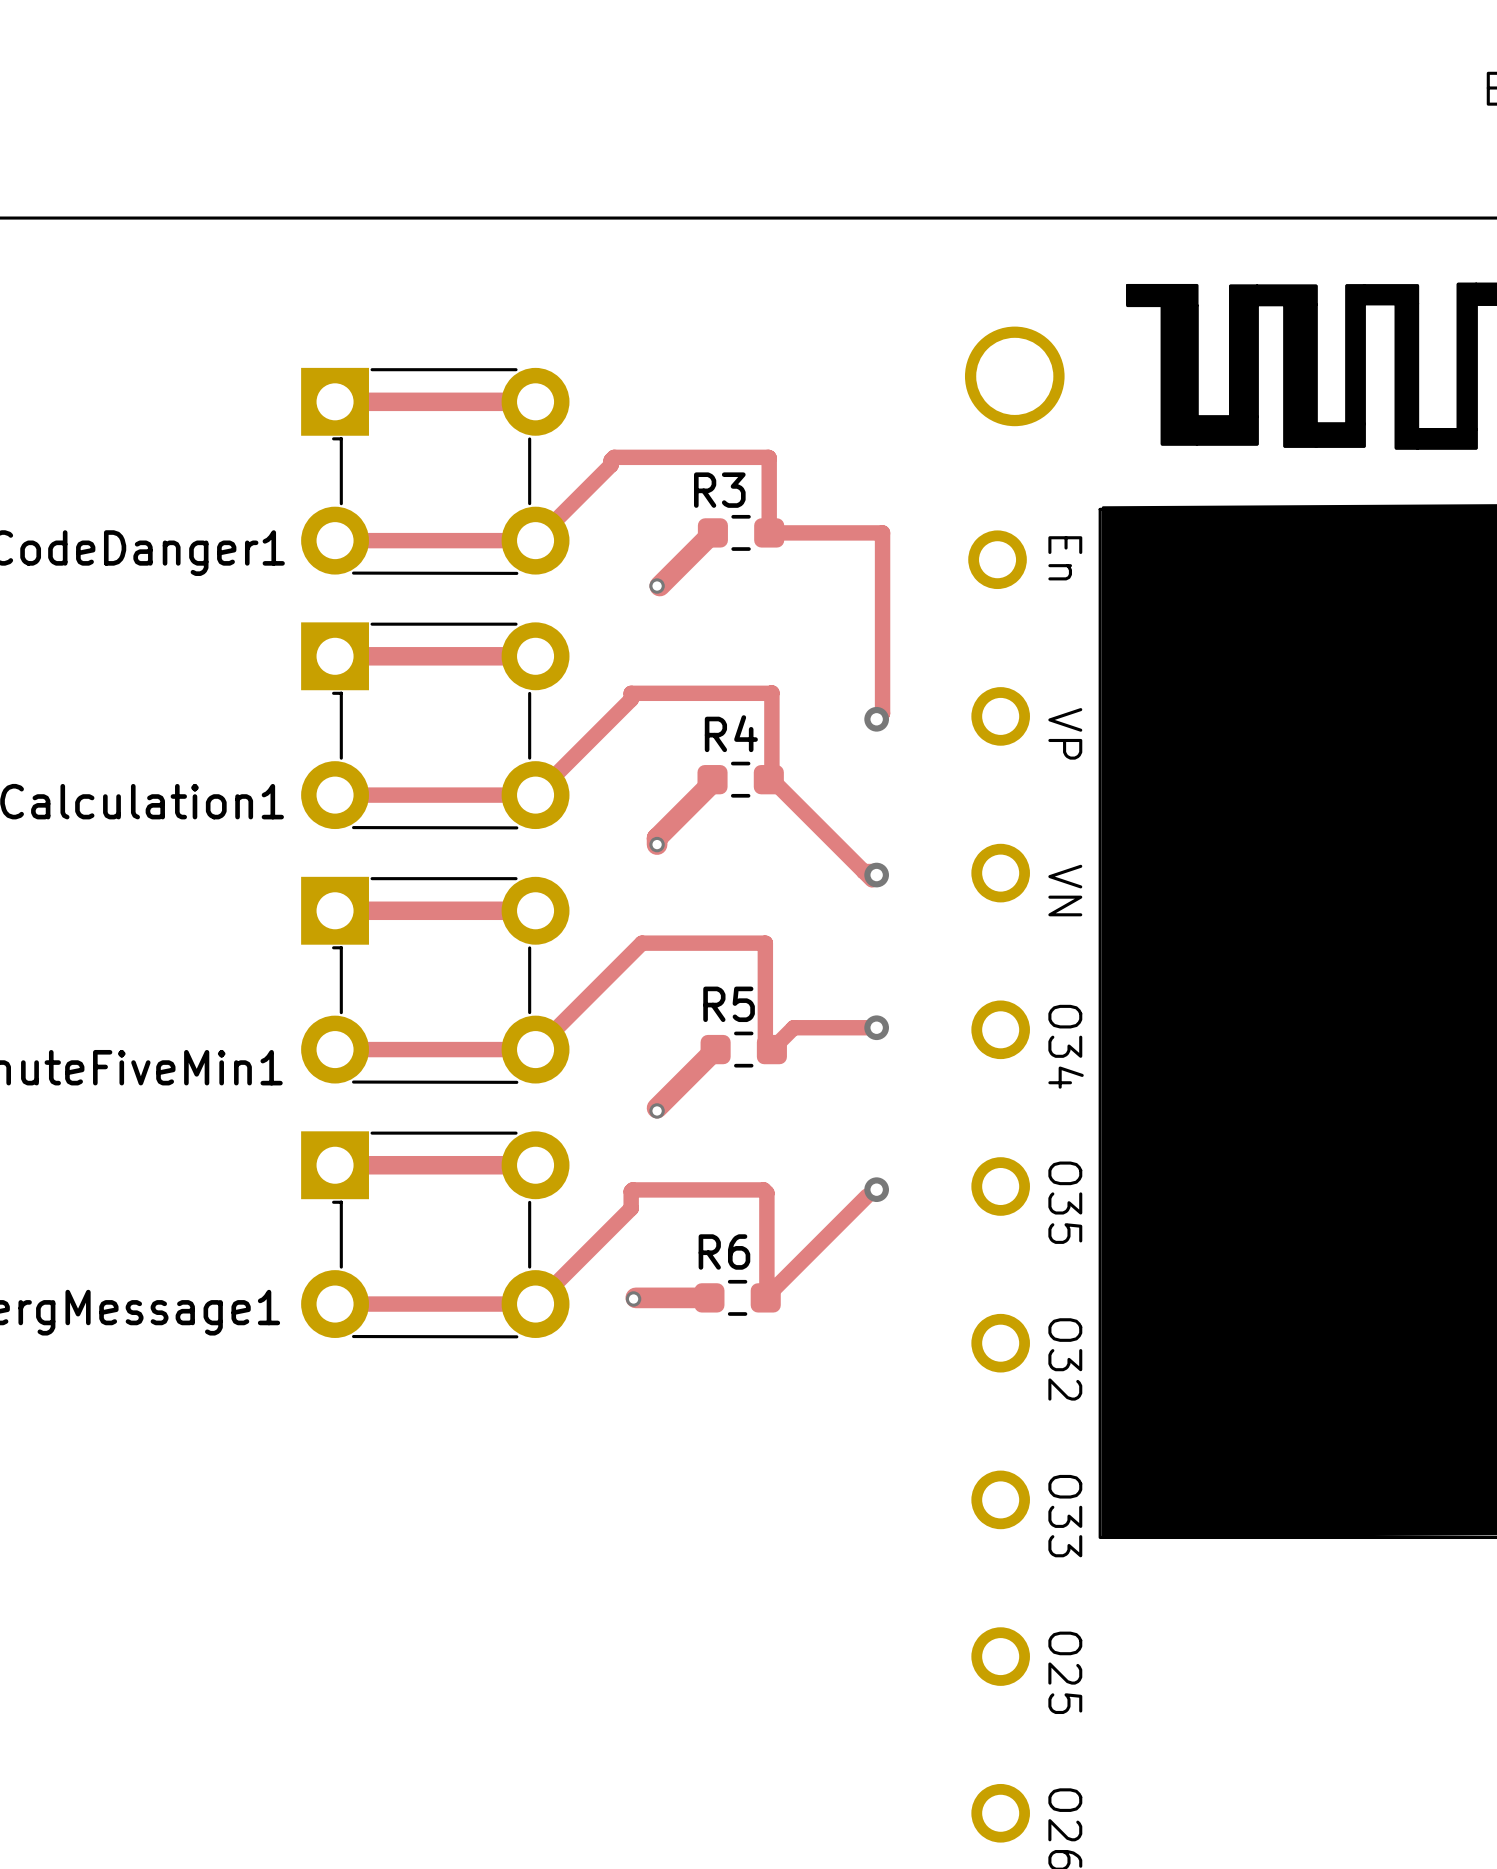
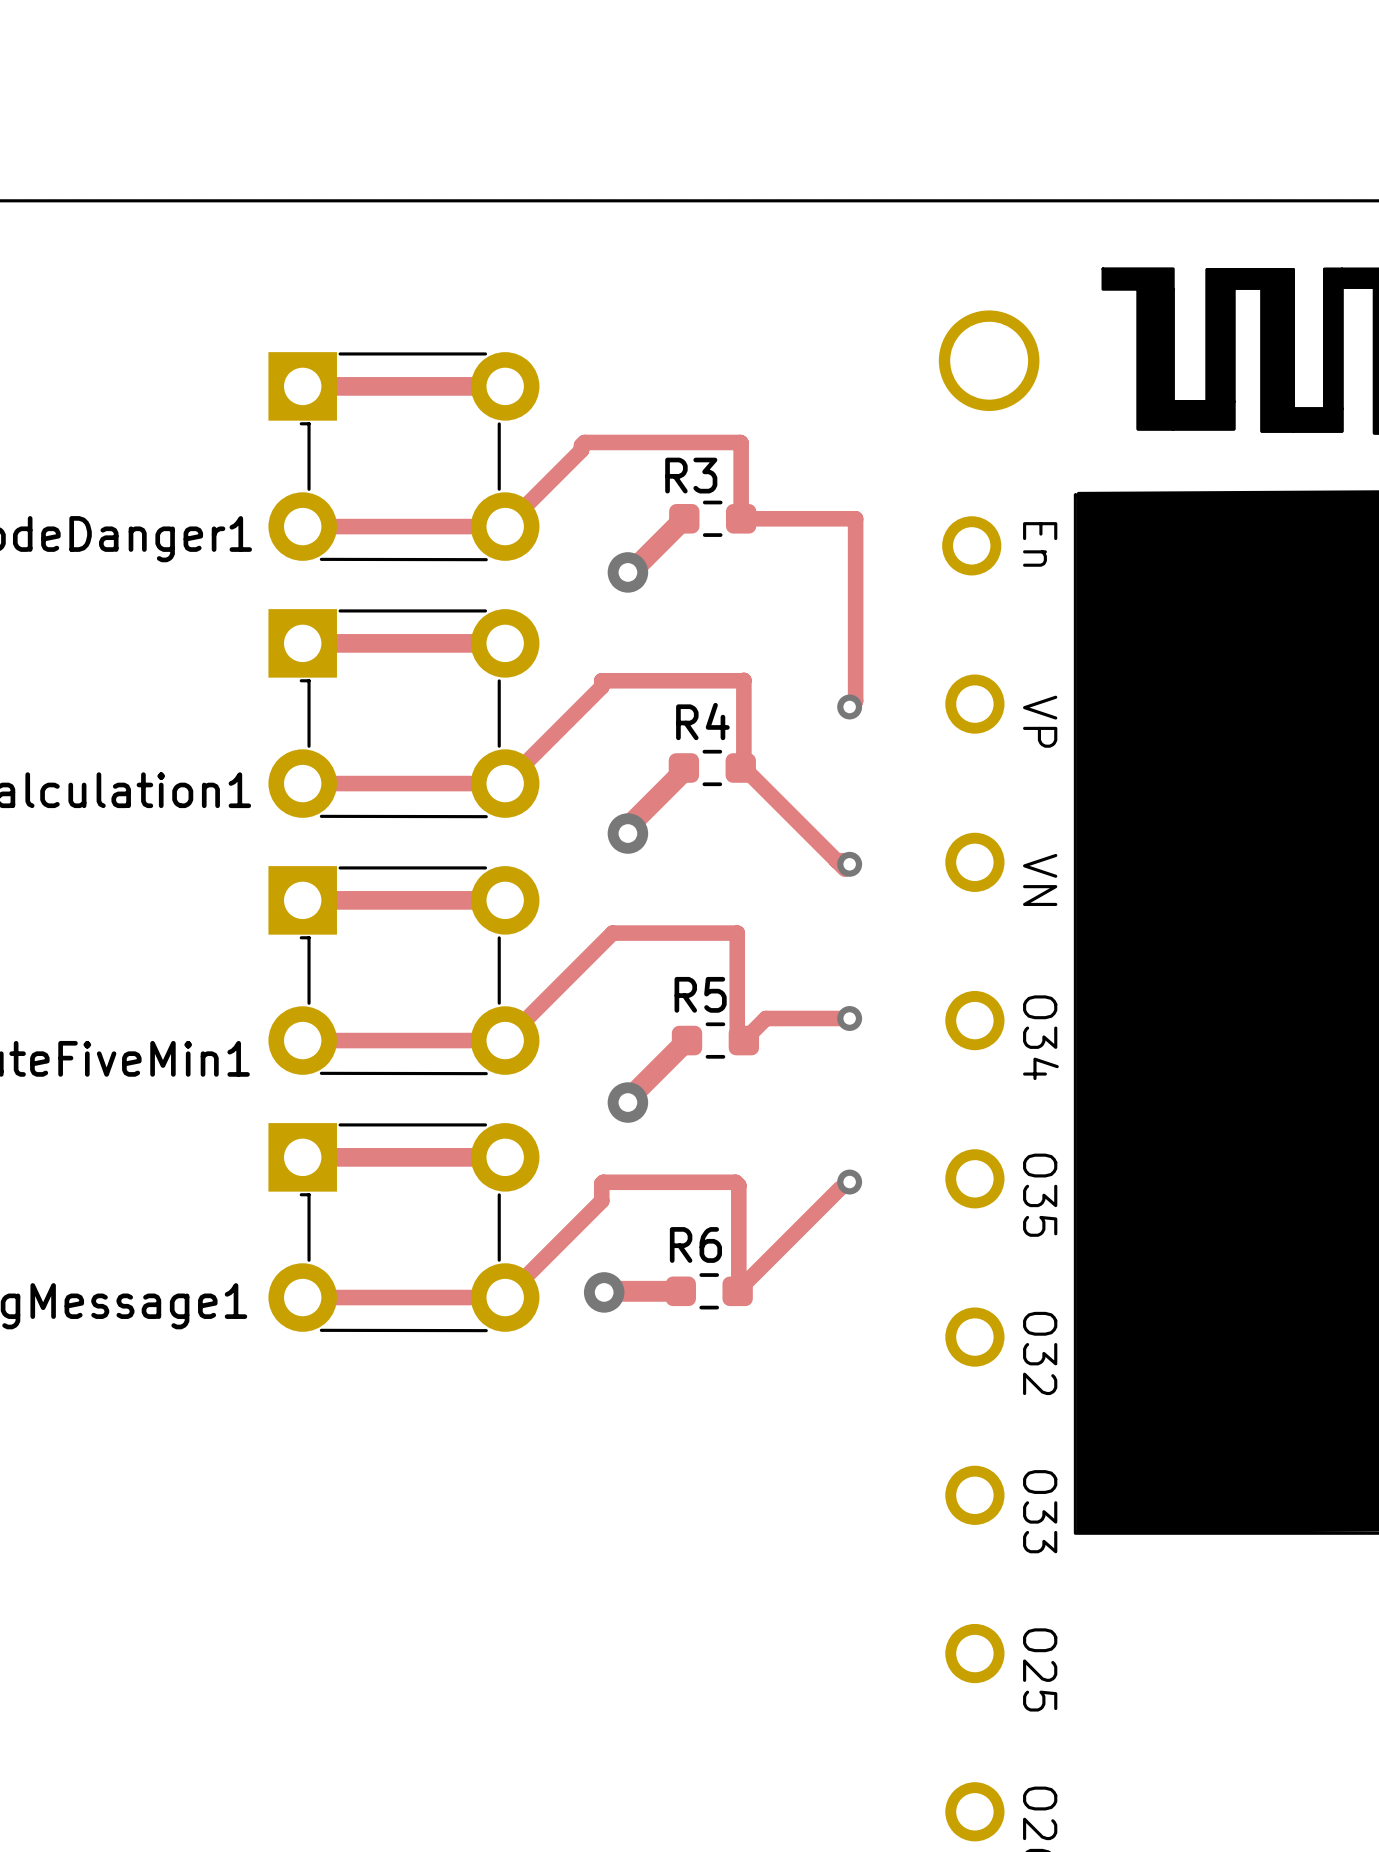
via size: [649, 578, 665, 594] -> [607, 552, 649, 593]
via size: [649, 836, 665, 853] -> [607, 813, 649, 854]
via size: [649, 1103, 665, 1119] -> [607, 1082, 649, 1123]
via size: [625, 1291, 642, 1307] -> [583, 1272, 625, 1313]

